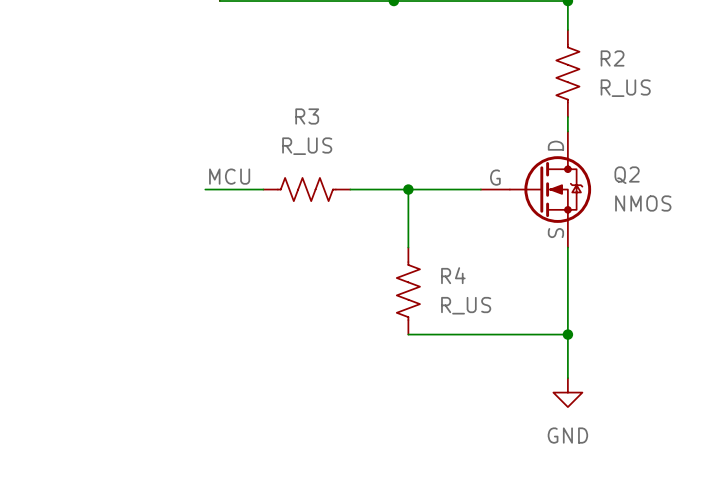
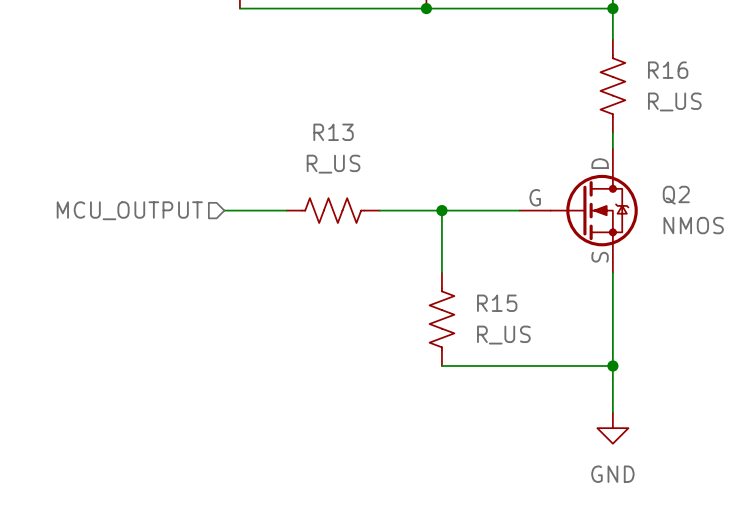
R2 name: R2 (612, 58) -> R16 (668, 70)
R3 name: R3 (307, 116) -> R13 (333, 132)
label: MCU (229, 176) -> none
hierarchical label: none -> MCU_OUTPUT (129, 210)
R4 name: R4 (453, 275) -> R15 (497, 303)

